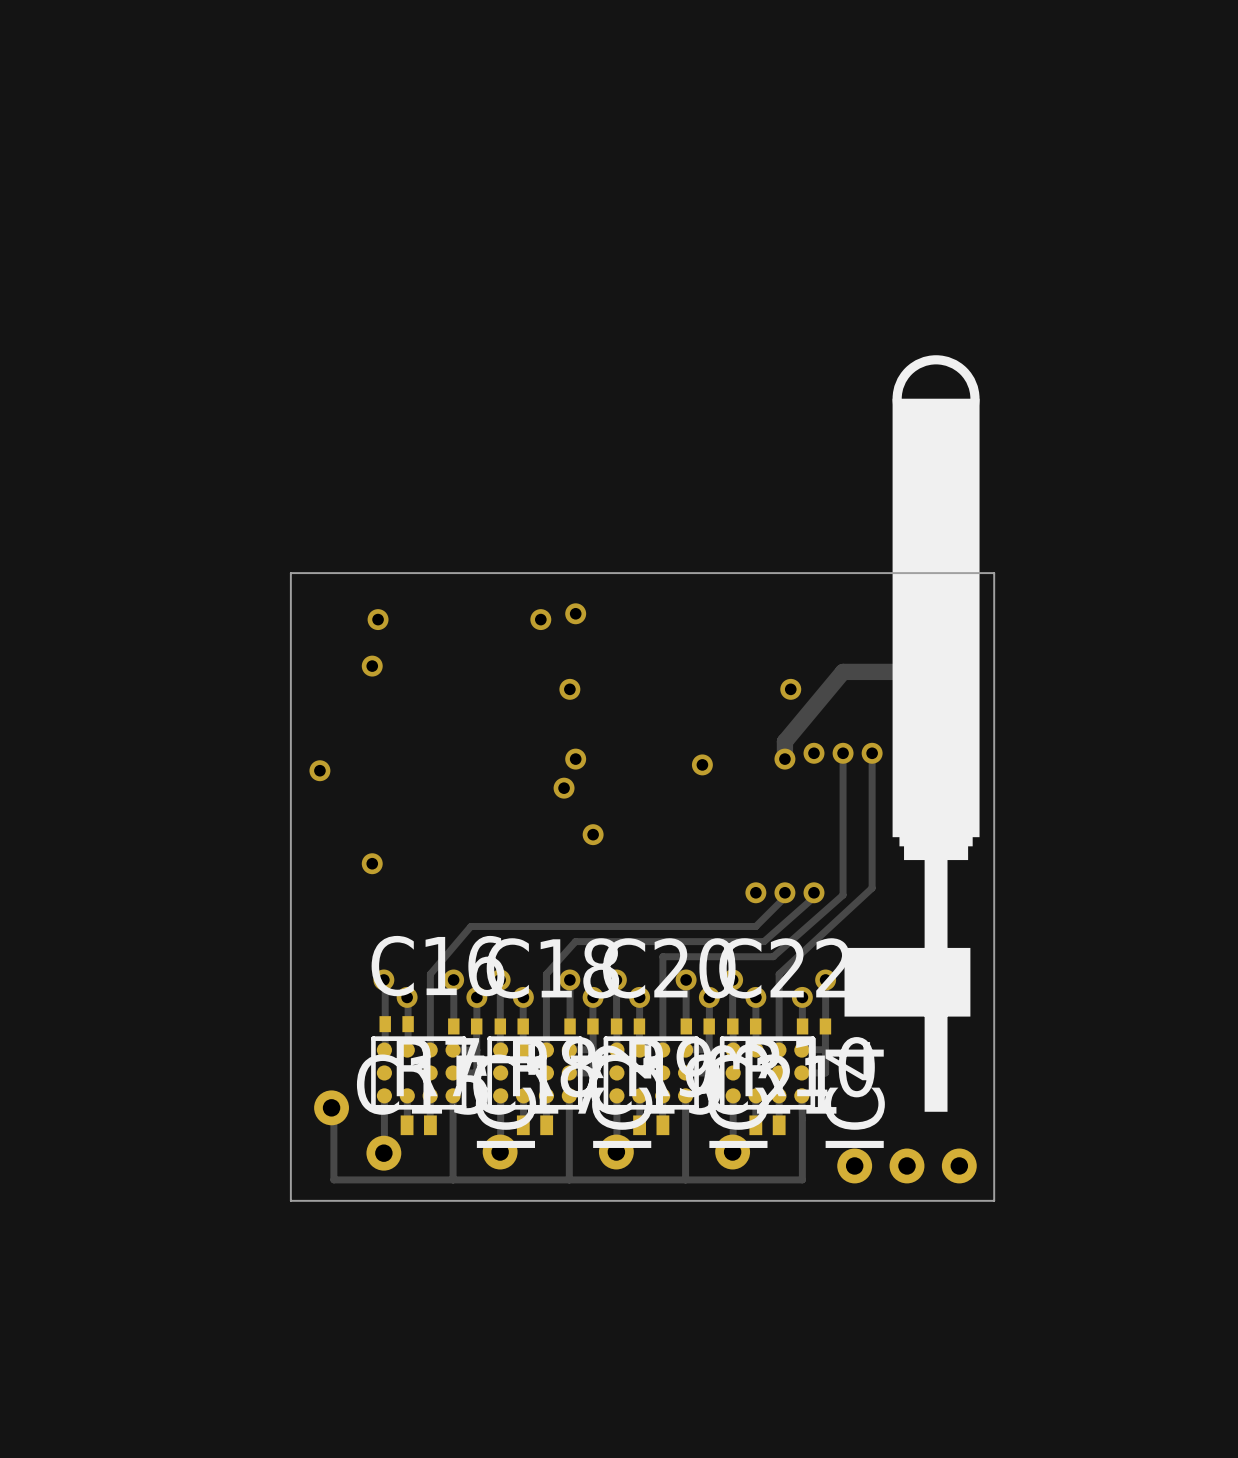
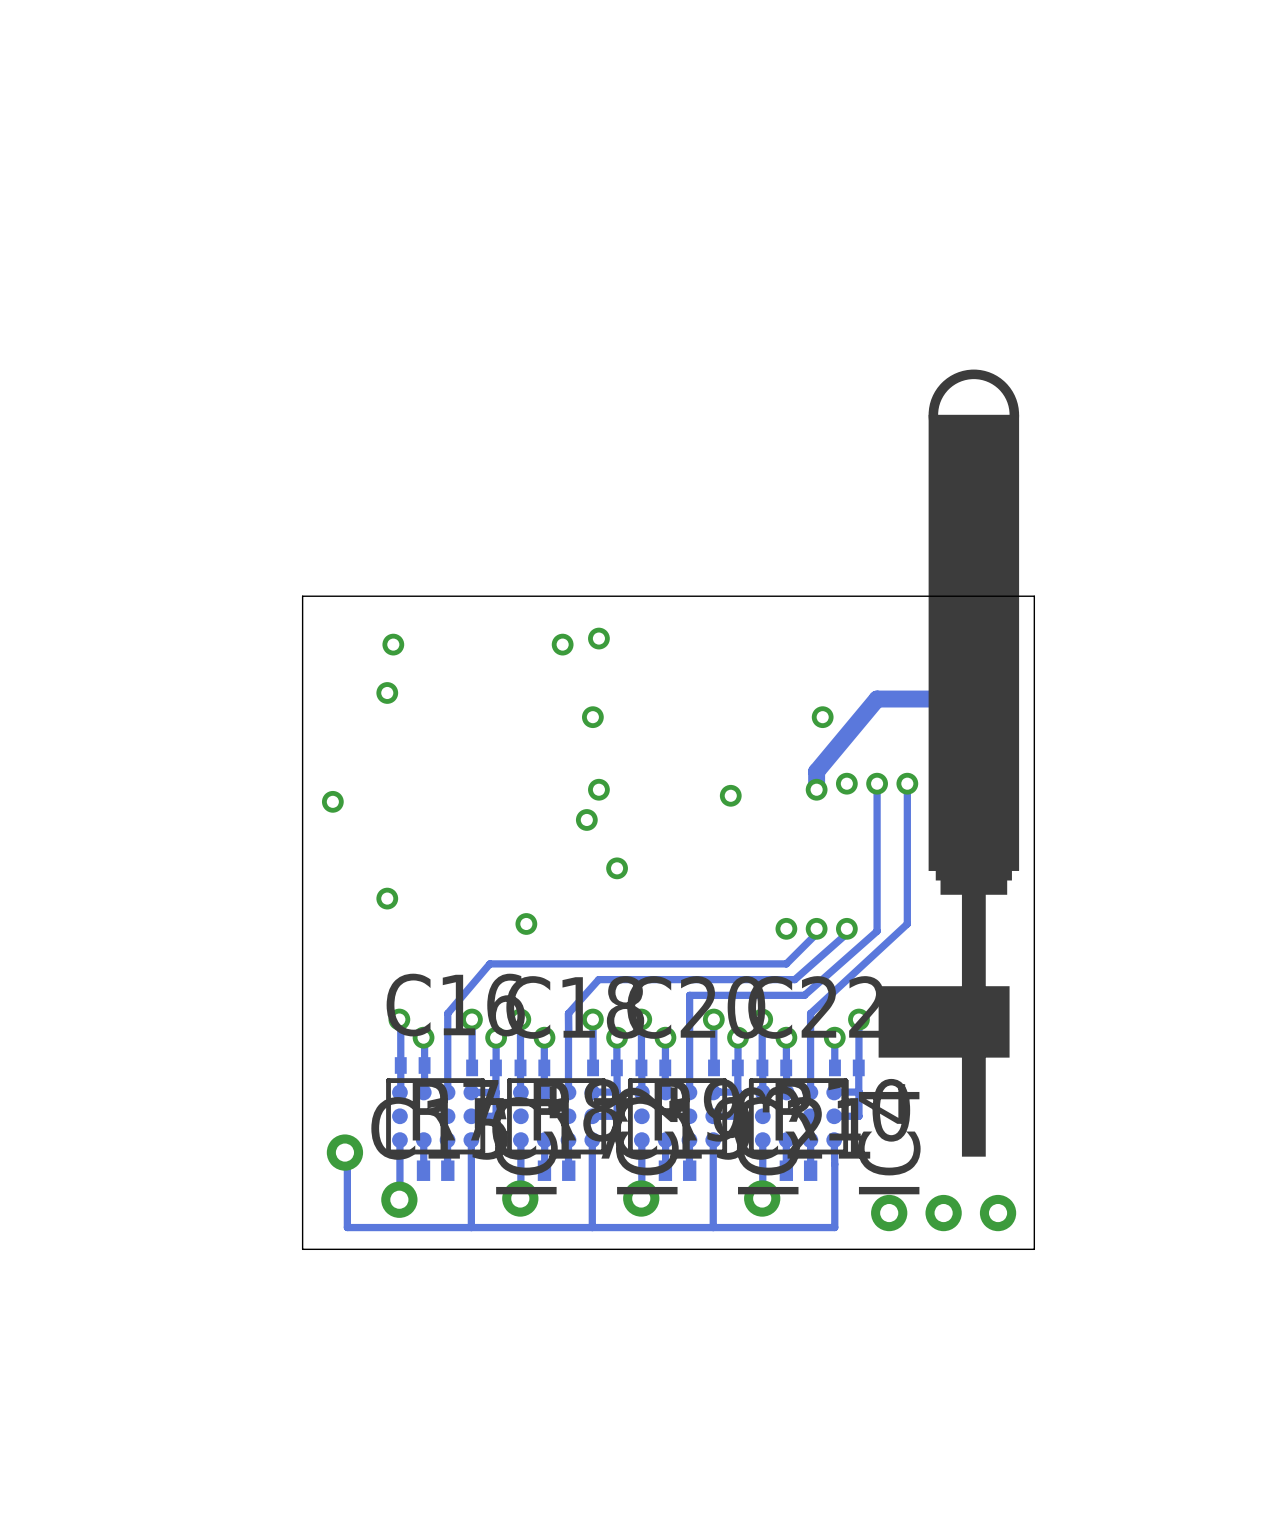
via: none -> (526, 923)

